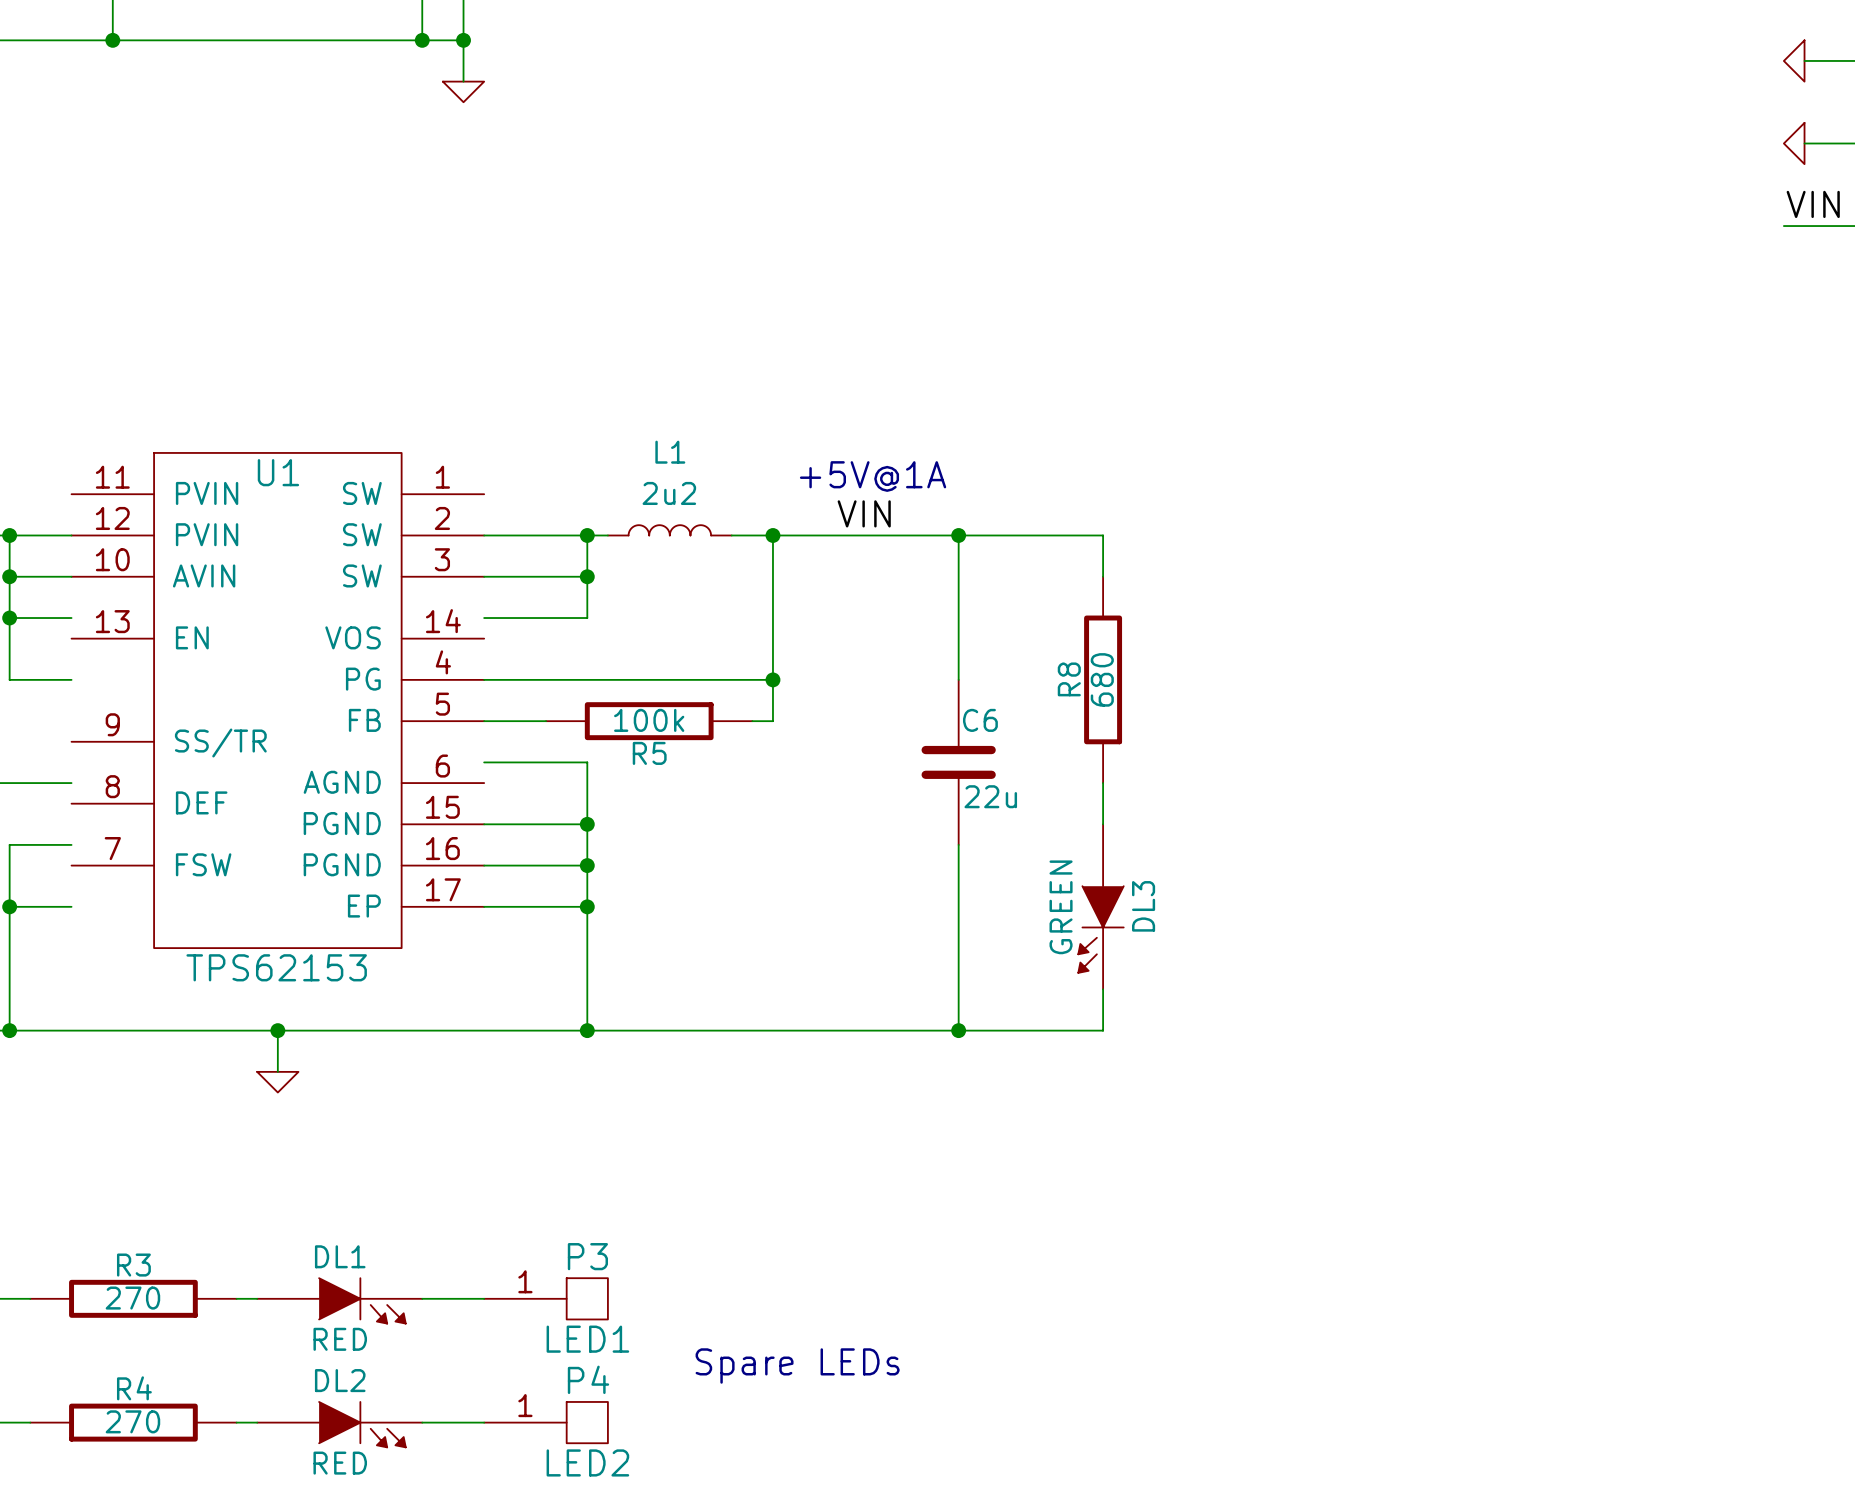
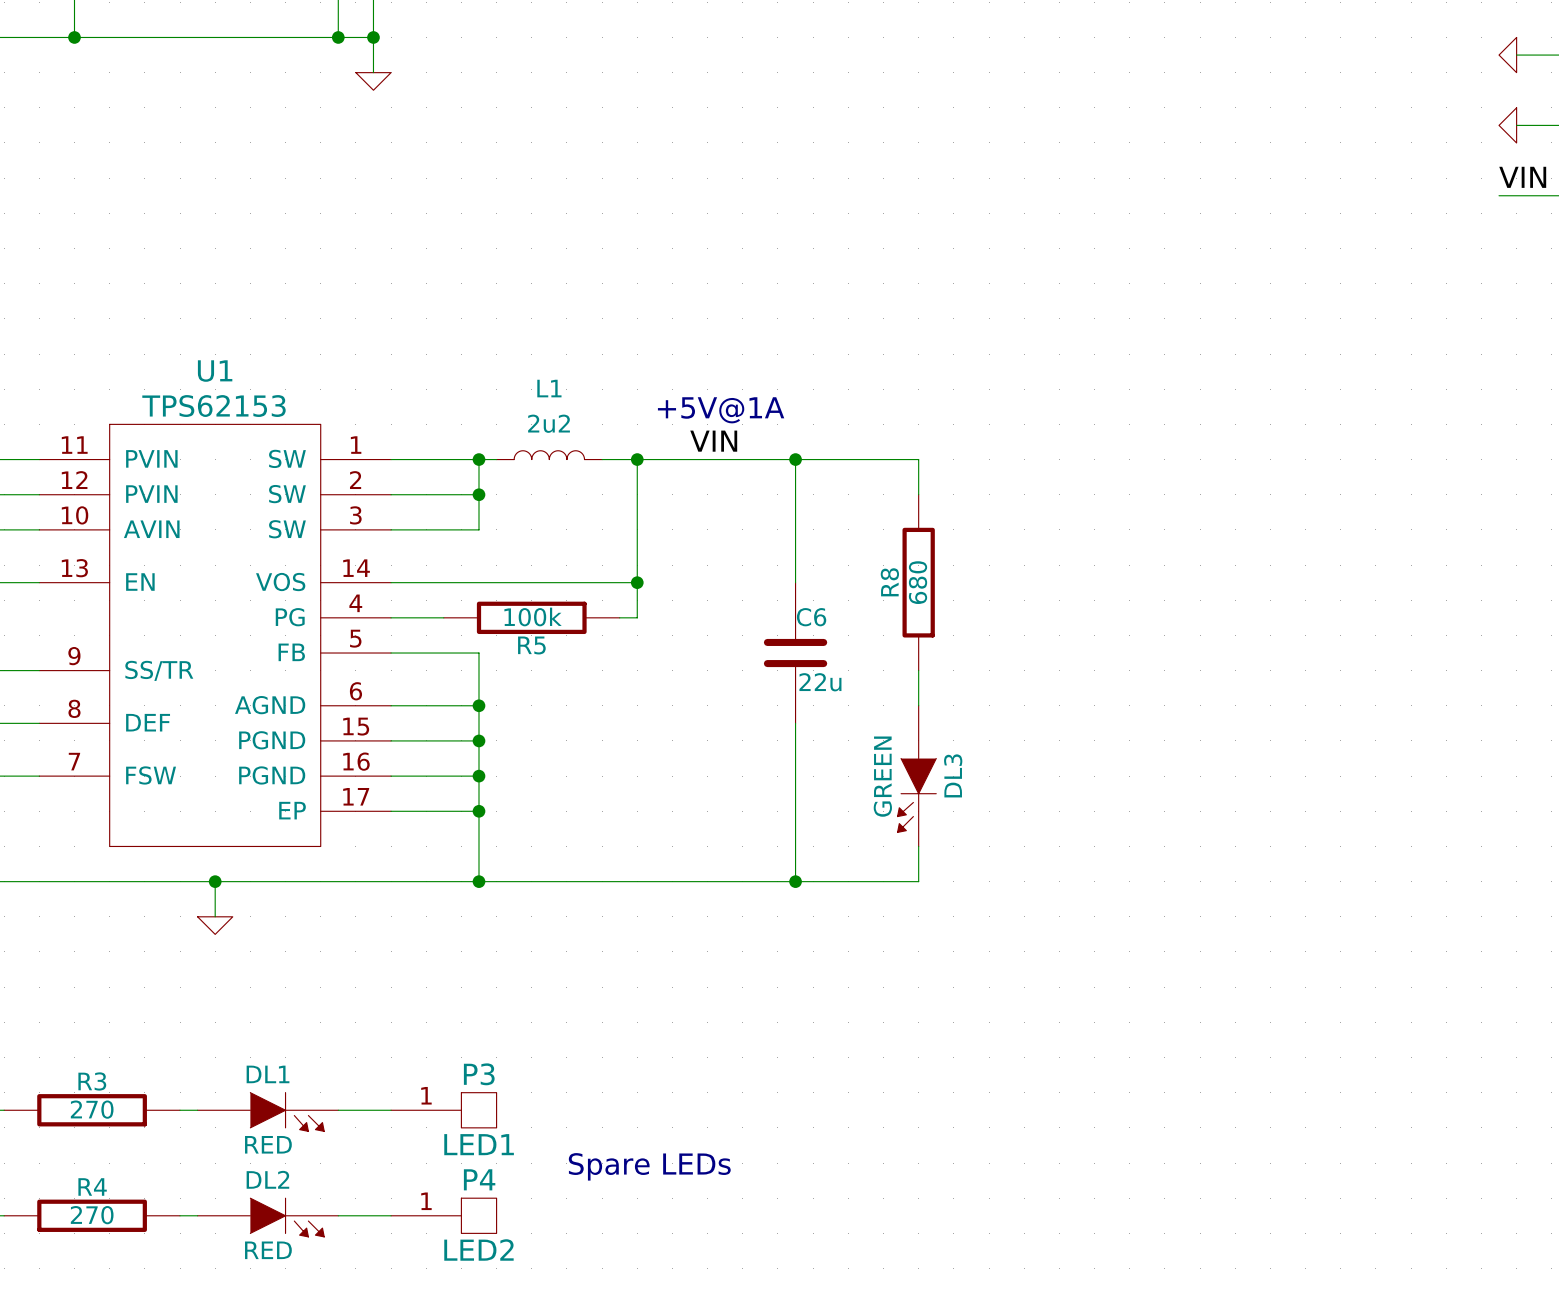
U1 name position: U1 (278, 472) -> U1 (215, 371)
U1 position: (277, 700) -> (215, 635)
wire: none -> (391, 811) (478, 811)
junction: none -> (478, 811)
U1 value position: TPS62153 (276, 967) -> TPS62153 (213, 406)

